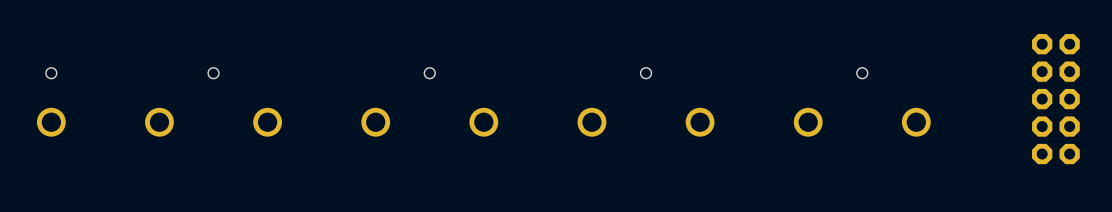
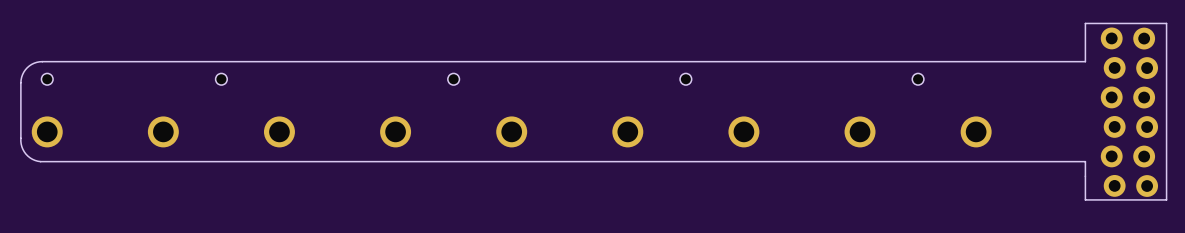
board edge: none -> (1166, 23) (1166, 199) (1085, 199) (1085, 161) (40, 161) (27, 156) (22, 149) (20, 141) (21, 77) (29, 65) (39, 61) (1085, 61) (1085, 23) (1166, 23)
part: (1055, 99) -> none
part: none -> (1113, 112)
part: none -> (1145, 112)

